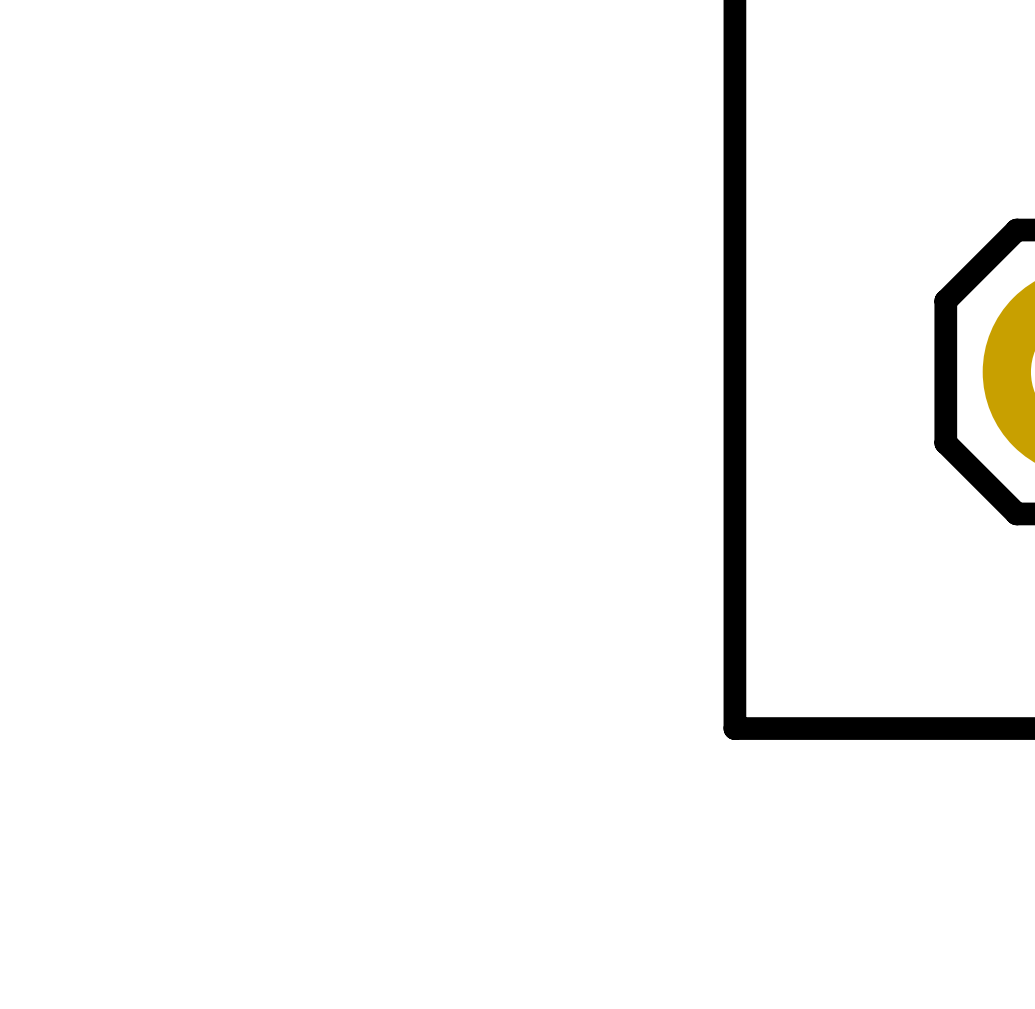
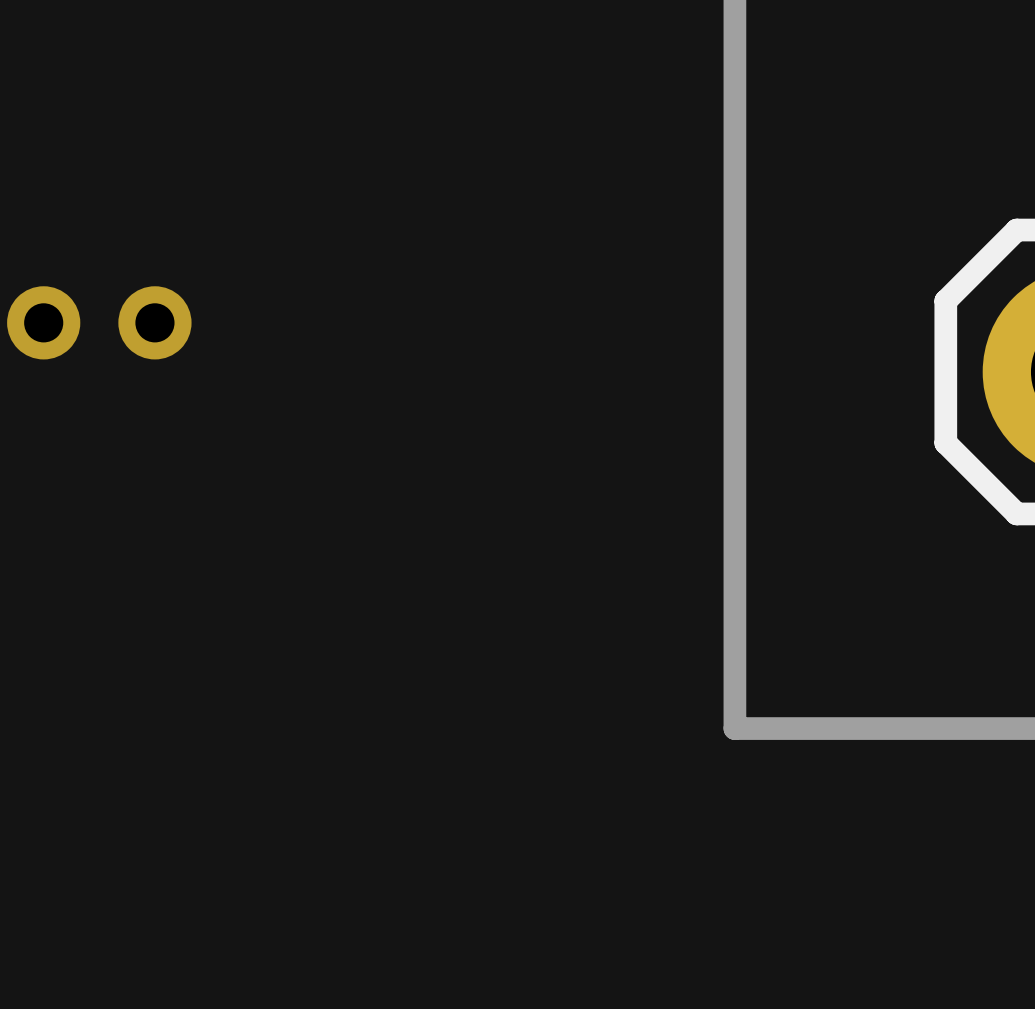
via: none -> (43, 322)
via: none -> (154, 322)

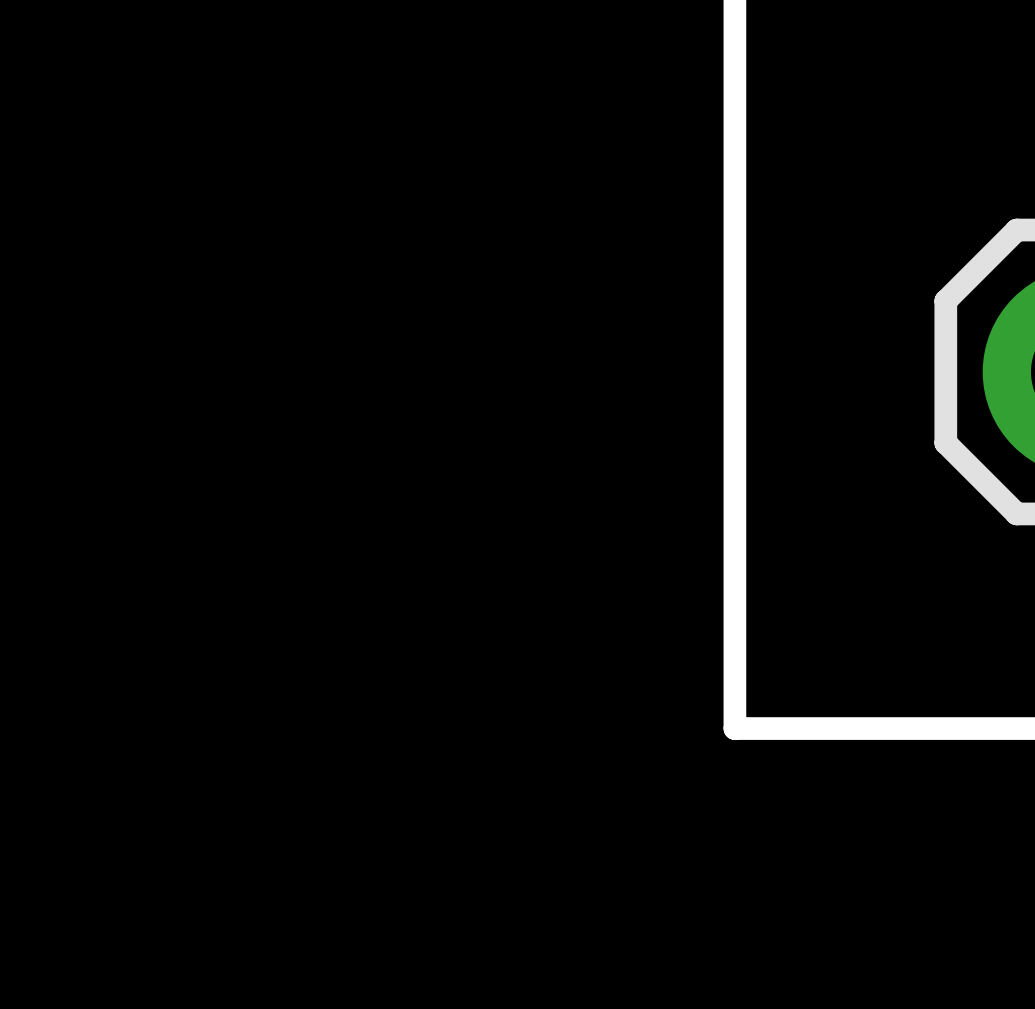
via: (43, 322) -> none
via: (154, 322) -> none

